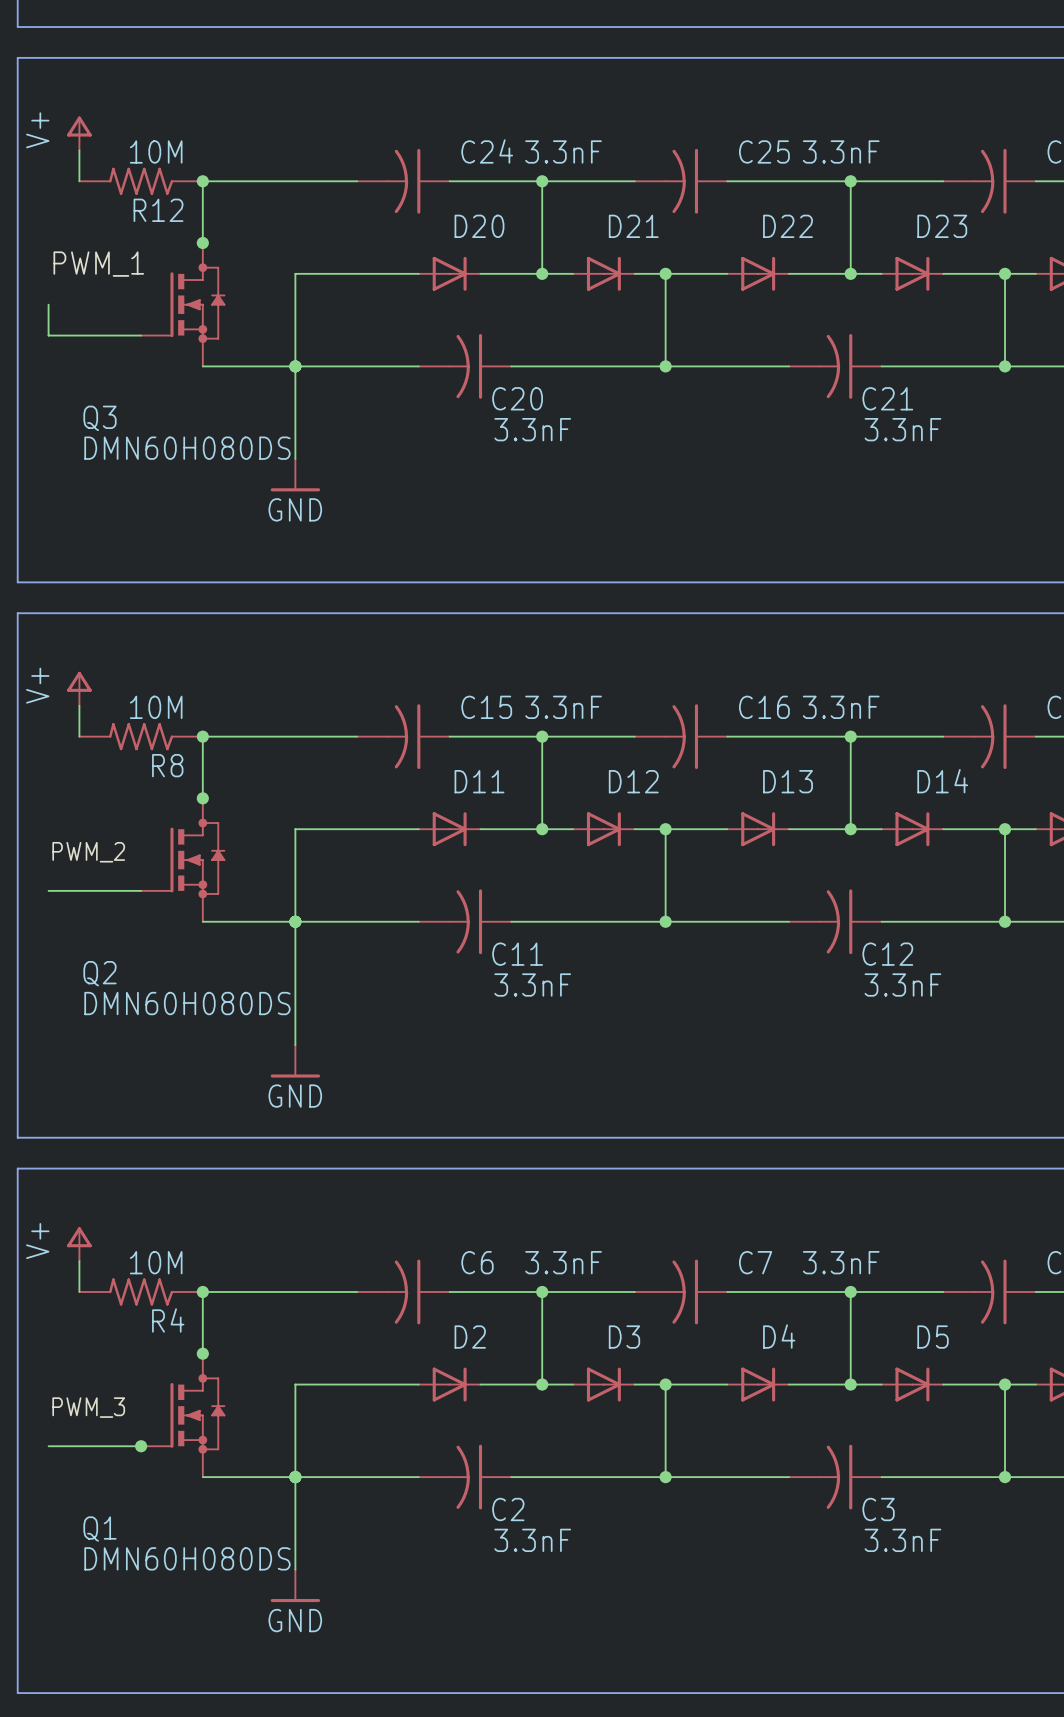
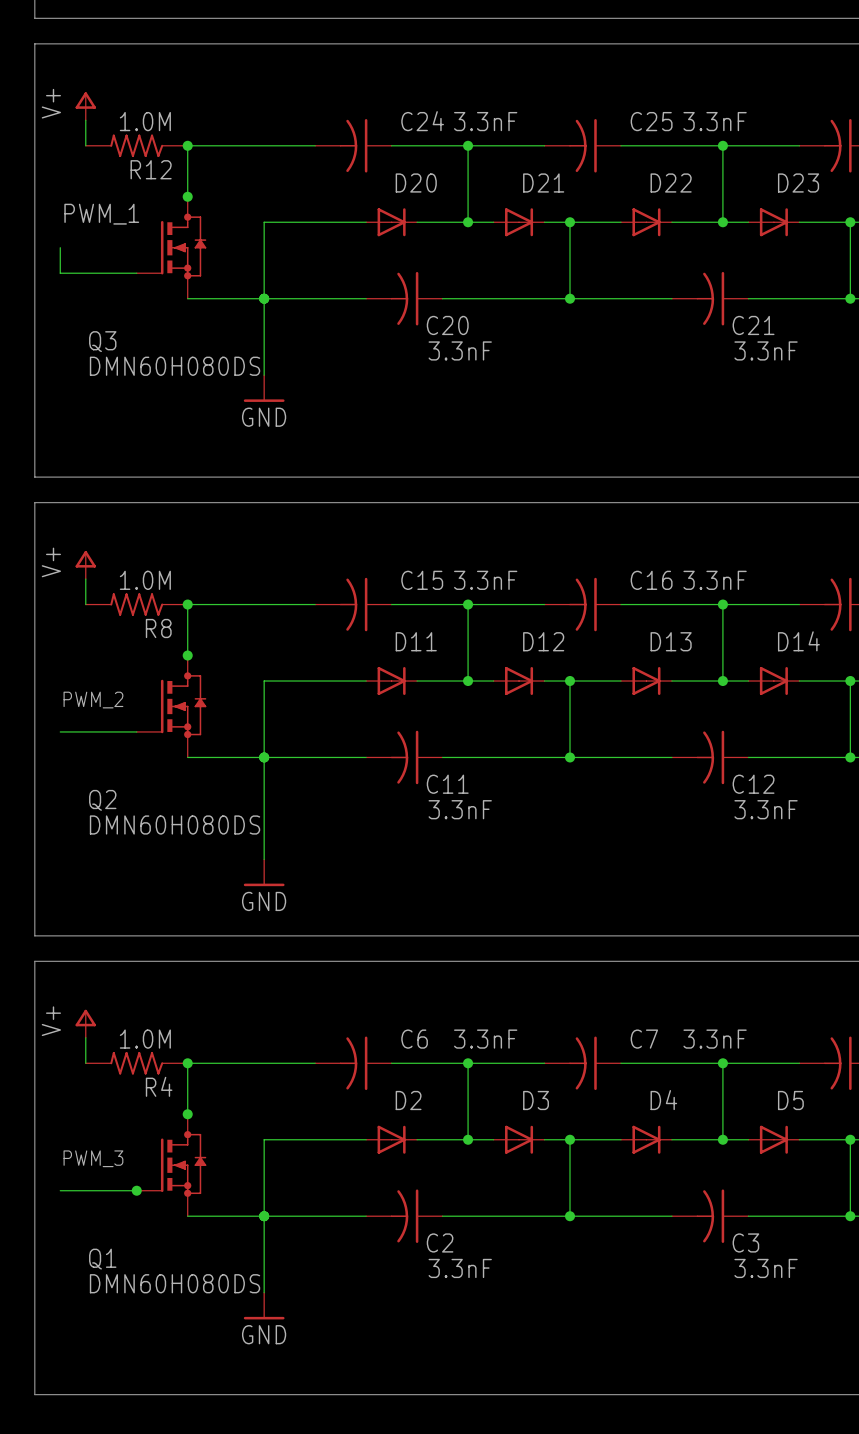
R12 value: 10M (156, 151) -> 1.0M (145, 121)
R8 value: 10M (156, 707) -> 1.0M (145, 580)
R4 value: 10M (156, 1262) -> 1.0M (145, 1039)

